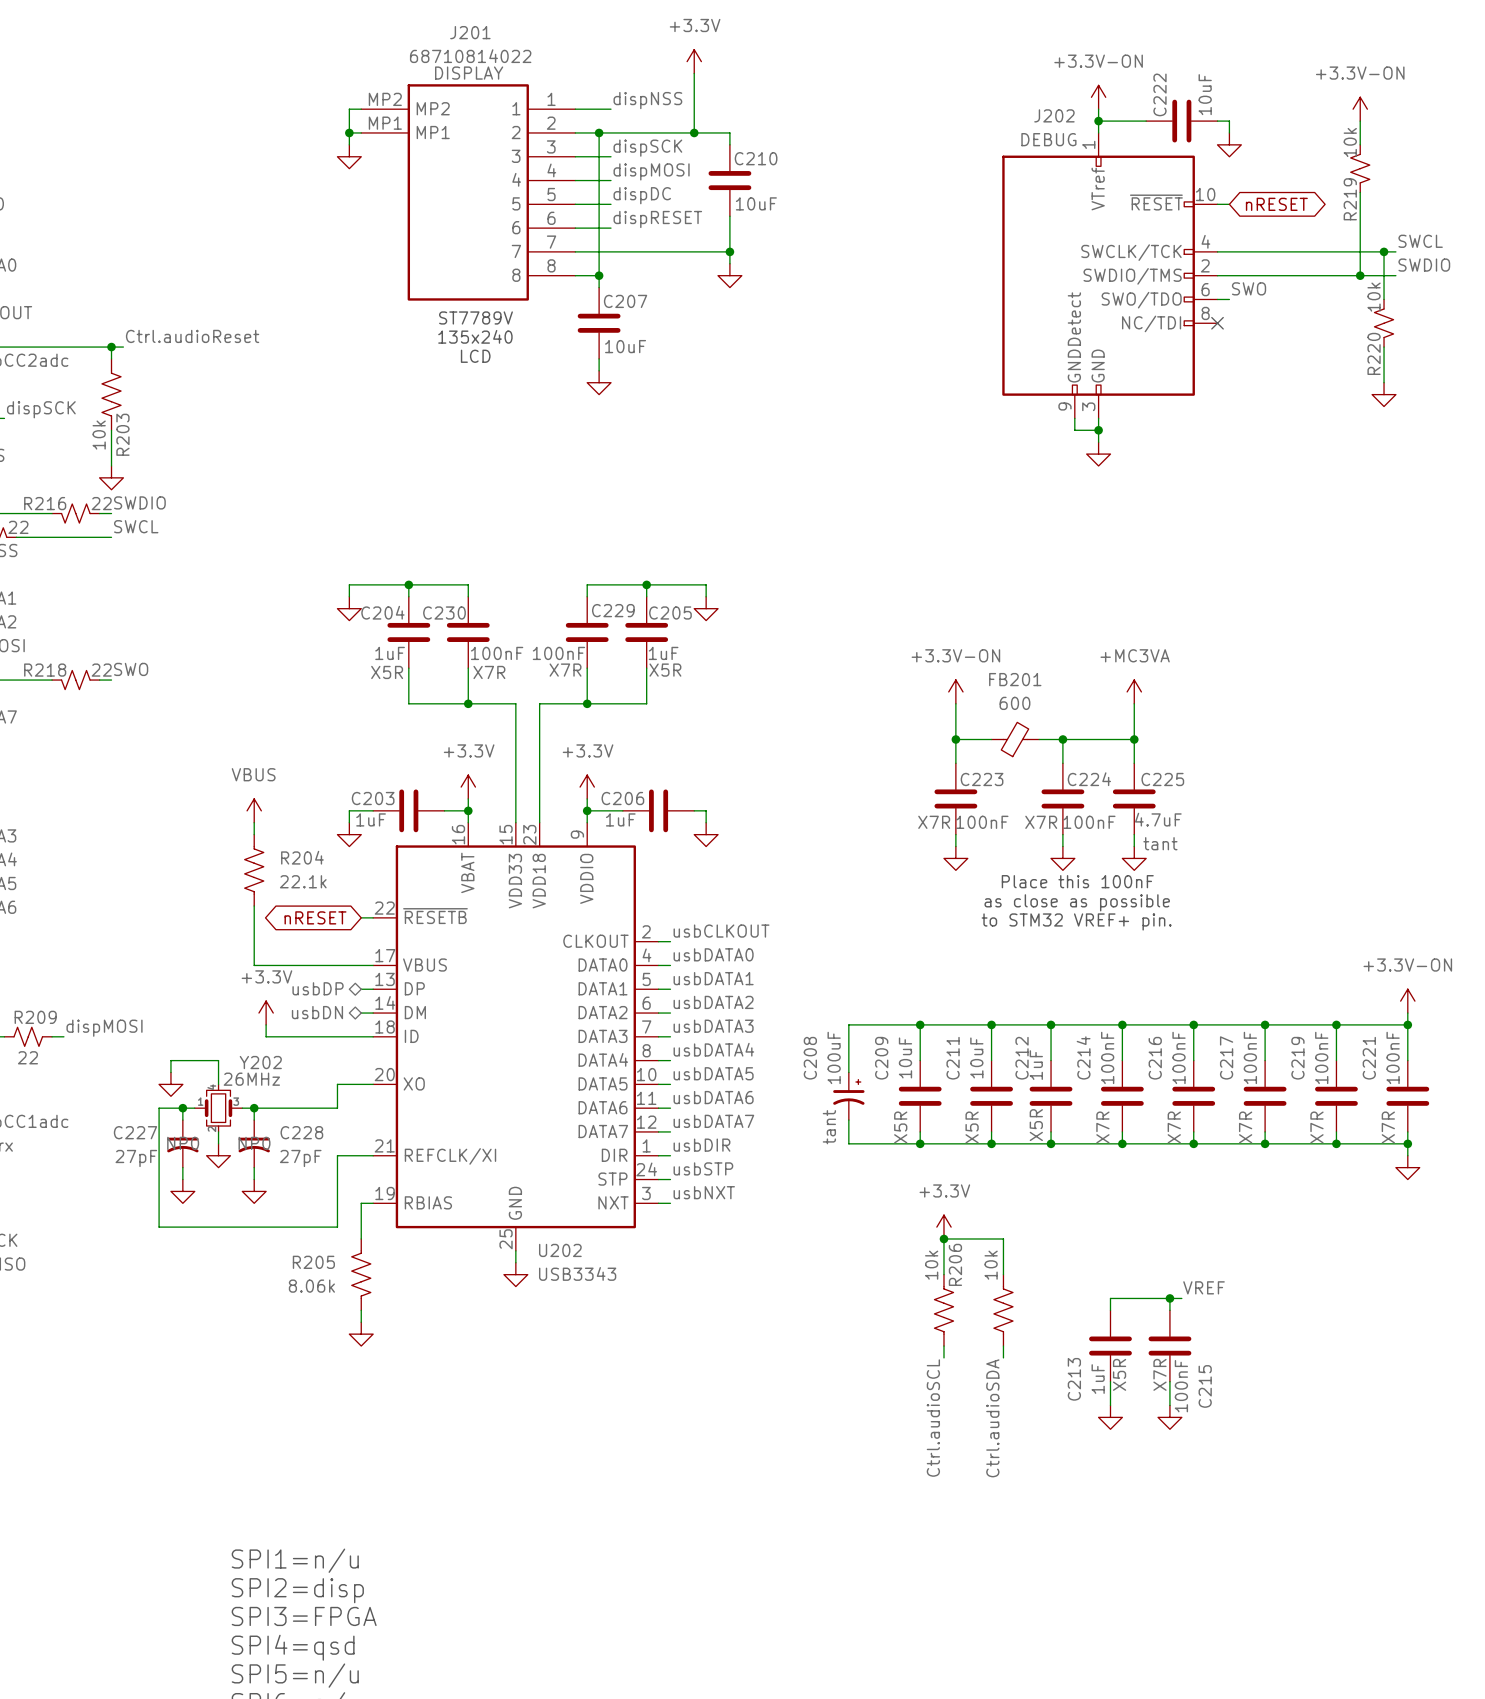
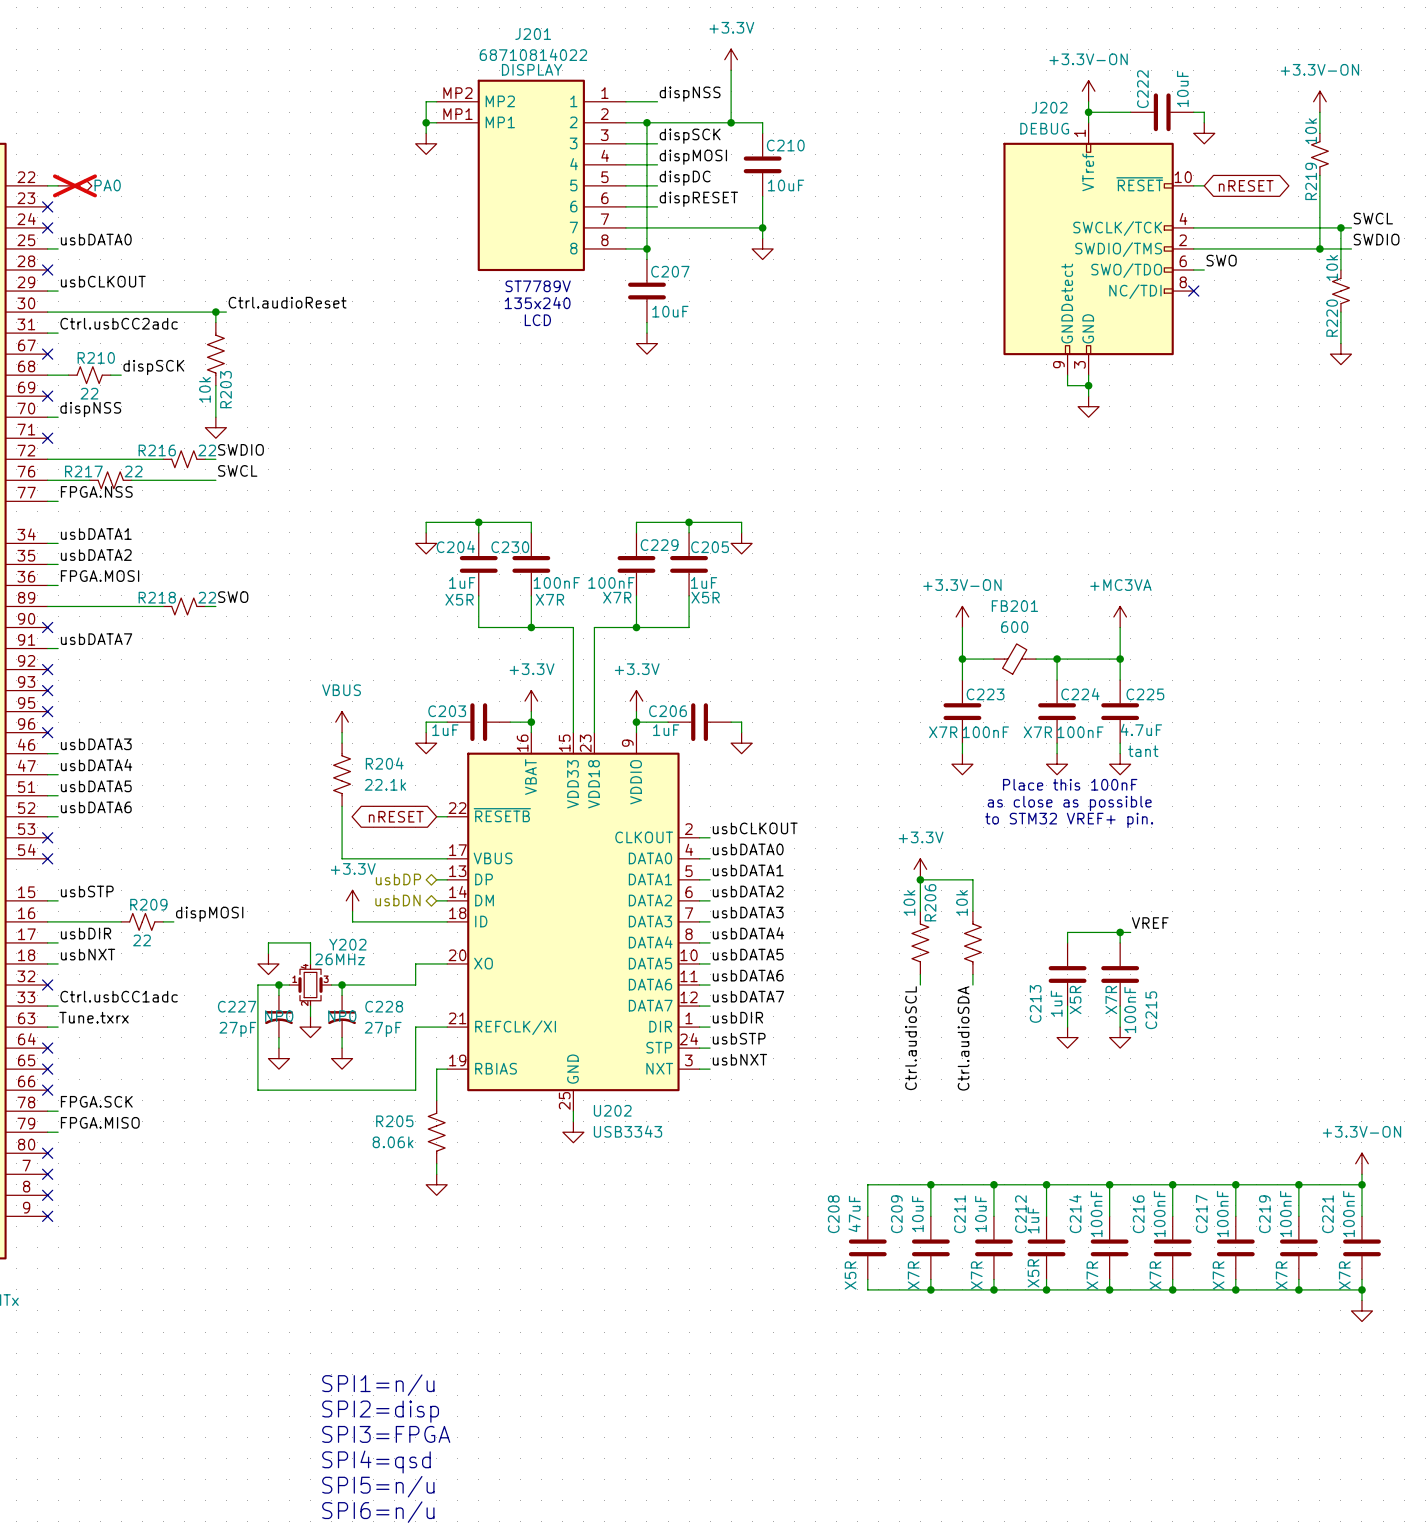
power symbol: none -> +3.3V (920, 869)
power symbol: +3.3V-ON (1407, 1001) -> none
wire: (1407, 1013) (1407, 1060) -> none
wire: none -> (920, 911) (920, 879) (972, 879) (972, 911)
wire: (920, 1024) (920, 1060) -> none
junction position: (920, 1024) -> (920, 879)
wire: (991, 1024) (991, 1060) -> none
junction: (991, 1024) -> none
wire: (1051, 1024) (1051, 1060) -> none
junction: (1051, 1024) -> none
wire: (1122, 1024) (1122, 1060) -> none
junction position: (1122, 1024) -> (1120, 932)
wire: (1193, 1024) (1193, 1060) -> none
junction: (1193, 1024) -> none
wire: (1265, 1024) (1265, 1060) -> none
junction: (1265, 1024) -> none
wire: (1336, 1024) (1336, 1060) -> none
junction: (1336, 1024) -> none
wire: (1407, 1024) (848, 1024) (848, 1072) -> none
junction: (1407, 1024) -> none
label: none -> VREF (1150, 923)
wire: none -> (1130, 932) (1067, 932) (1067, 942)
C208 value: 100uF (834, 1057) -> 47uF (854, 1213)
part: none -> 10k (972, 942)
C208 symbol: [833, 1072, 865, 1121] -> [848, 1216, 887, 1280]
C209 position: (920, 1096) -> (930, 1247)
C211 position: (991, 1096) -> (993, 1247)
C212 position: (1051, 1096) -> (1046, 1247)
C214 position: (1122, 1096) -> (1109, 1247)
C216 position: (1193, 1096) -> (1172, 1247)
C217 position: (1265, 1096) -> (1235, 1247)
C219 position: (1336, 1096) -> (1298, 1247)
C221 position: (1407, 1096) -> (1361, 1247)
wire: (848, 1120) (848, 1143) (1407, 1143) -> none
C208 text: tant (829, 1127) -> X5R (850, 1275)
C209 text: X5R (900, 1127) -> X7R (913, 1275)
C211 text: X5R (972, 1127) -> X7R (976, 1275)
wire: (920, 1131) (920, 1143) -> none
wire: (991, 1131) (991, 1143) -> (920, 974) (920, 985)
wire: (1051, 1131) (1051, 1143) -> (972, 974) (972, 985)
wire: none -> (1067, 1006) (1067, 1027)
wire: (1122, 1131) (1122, 1143) -> (1120, 932) (1120, 942)
wire: none -> (1120, 1006) (1120, 1027)
wire: (1193, 1131) (1193, 1143) -> none
wire: (1265, 1131) (1265, 1143) -> none
wire: (1336, 1131) (1336, 1143) -> none
wire: (1407, 1131) (1407, 1155) -> none
junction: (920, 1143) -> none
junction: (991, 1143) -> none
junction: (1051, 1143) -> none
junction: (1122, 1143) -> none
junction: (1193, 1143) -> none
junction: (1265, 1143) -> none
junction: (1336, 1143) -> none
junction: (1407, 1143) -> none
power symbol: none -> (1067, 1037)
power symbol: none -> (1120, 1037)
power symbol: (1407, 1167) -> none
label: none -> Ctrl.audioSCL (910, 1038)
label: none -> Ctrl.audioSDA (963, 1038)
power symbol: +3.3V (943, 1227) -> none
junction: (943, 1238) -> none
wire: (943, 1274) (943, 1238) (1003, 1238) (1003, 1274) -> none
label: VREF (1204, 1287) -> none
wire: (1169, 1298) (1169, 1310) -> (1172, 1279) (1172, 1289)
junction: (1169, 1298) -> none
wire: (1181, 1298) (1110, 1298) (1110, 1310) -> none
R206 position: (943, 1310) -> (920, 942)
part: 10k (1003, 1310) -> none
power symbol: none -> +3.3V-ON (1361, 1163)
wire: none -> (1361, 1174) (1361, 1216)
wire: none -> (930, 1184) (930, 1216)
junction: none -> (930, 1184)
wire: none -> (993, 1184) (993, 1216)
junction: none -> (993, 1184)
wire: none -> (1046, 1184) (1046, 1216)
junction: none -> (1046, 1184)
wire: none -> (1109, 1184) (1109, 1216)
junction: none -> (1109, 1184)
wire: none -> (1172, 1184) (1172, 1216)
junction: none -> (1172, 1184)
wire: none -> (1235, 1184) (1235, 1216)
junction: none -> (1235, 1184)
wire: none -> (1298, 1184) (1298, 1216)
junction: none -> (1298, 1184)
wire: none -> (1361, 1184) (867, 1184) (867, 1216)
junction: none -> (1361, 1184)
wire: (943, 1346) (943, 1357) -> (993, 1279) (993, 1289)
wire: (1003, 1346) (1003, 1357) -> (1046, 1279) (1046, 1289)
C213 position: (1110, 1346) -> (1067, 974)
C215 position: (1169, 1346) -> (1120, 974)
wire: (1110, 1381) (1110, 1405) -> none
wire: (1169, 1381) (1169, 1405) -> none
power symbol: (1110, 1417) -> none
power symbol: (1169, 1417) -> none
label: Ctrl.audioSCL (933, 1418) -> none
label: Ctrl.audioSDA (992, 1418) -> none
wire: none -> (867, 1279) (867, 1289) (1361, 1289)
wire: none -> (930, 1279) (930, 1289)
wire: none -> (1109, 1279) (1109, 1289)
wire: none -> (1235, 1279) (1235, 1289)
wire: none -> (1298, 1279) (1298, 1289)
wire: none -> (1361, 1279) (1361, 1300)
junction: none -> (930, 1289)
junction: none -> (993, 1289)
junction: none -> (1046, 1289)
junction: none -> (1109, 1289)
junction: none -> (1172, 1289)
junction: none -> (1235, 1289)
junction: none -> (1298, 1289)
junction: none -> (1361, 1289)
power symbol: none -> (1361, 1310)

